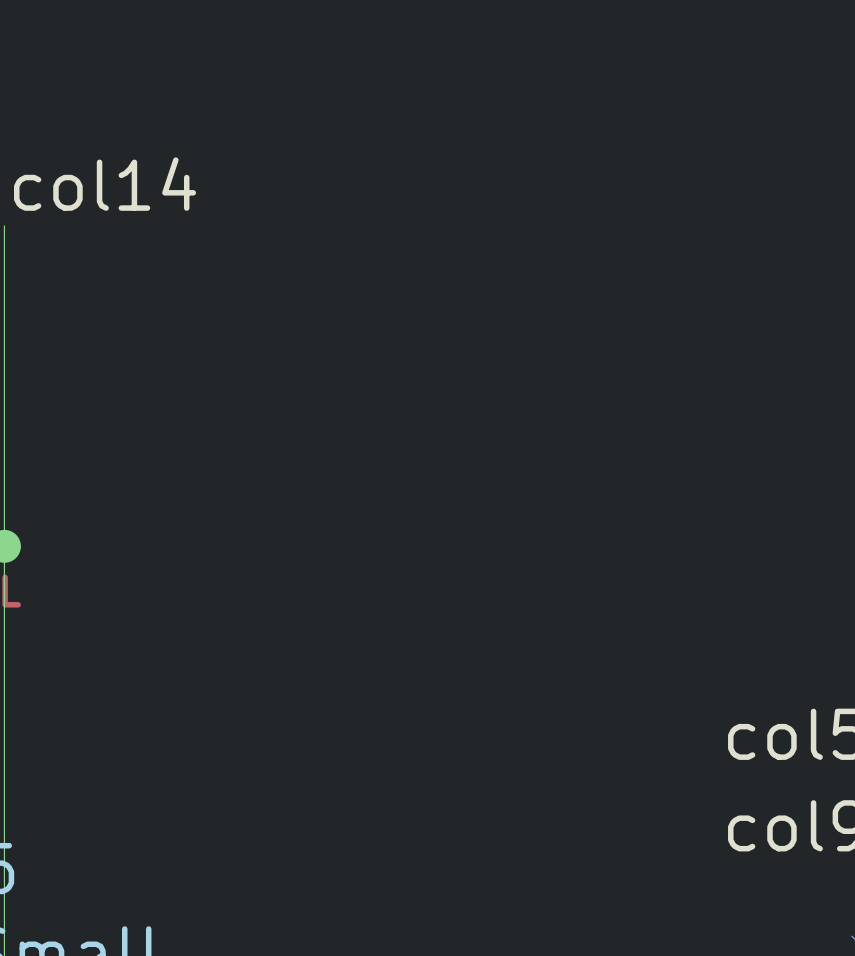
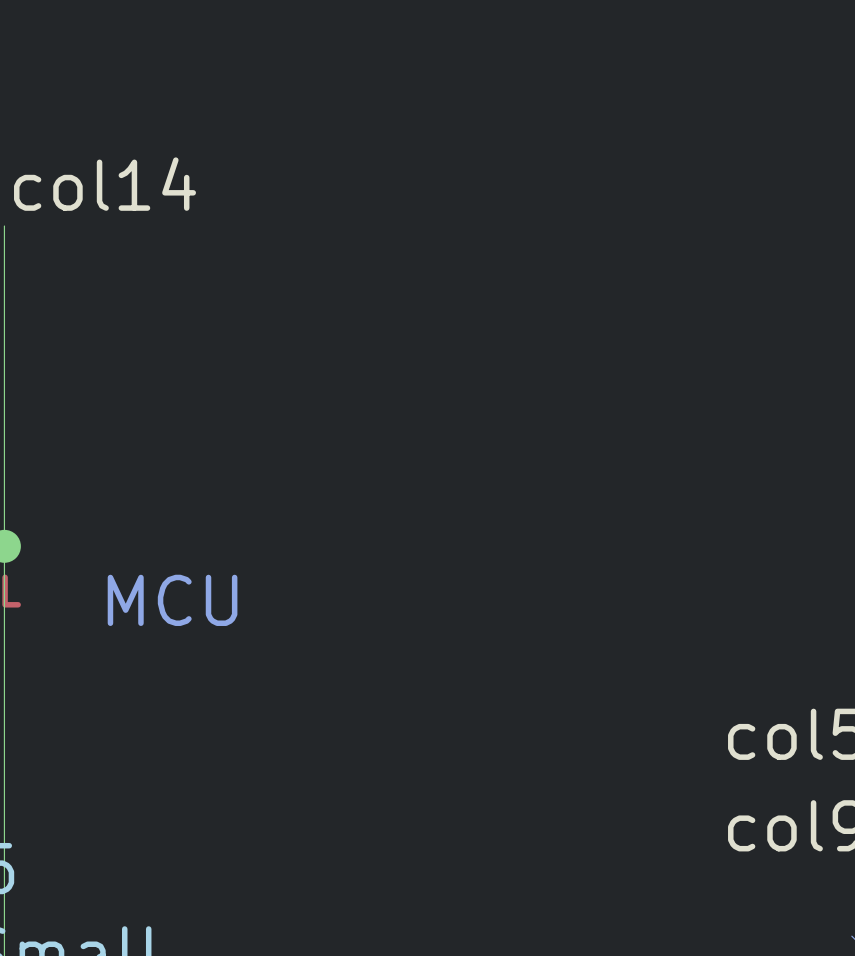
text: none -> MCU (172, 600)

